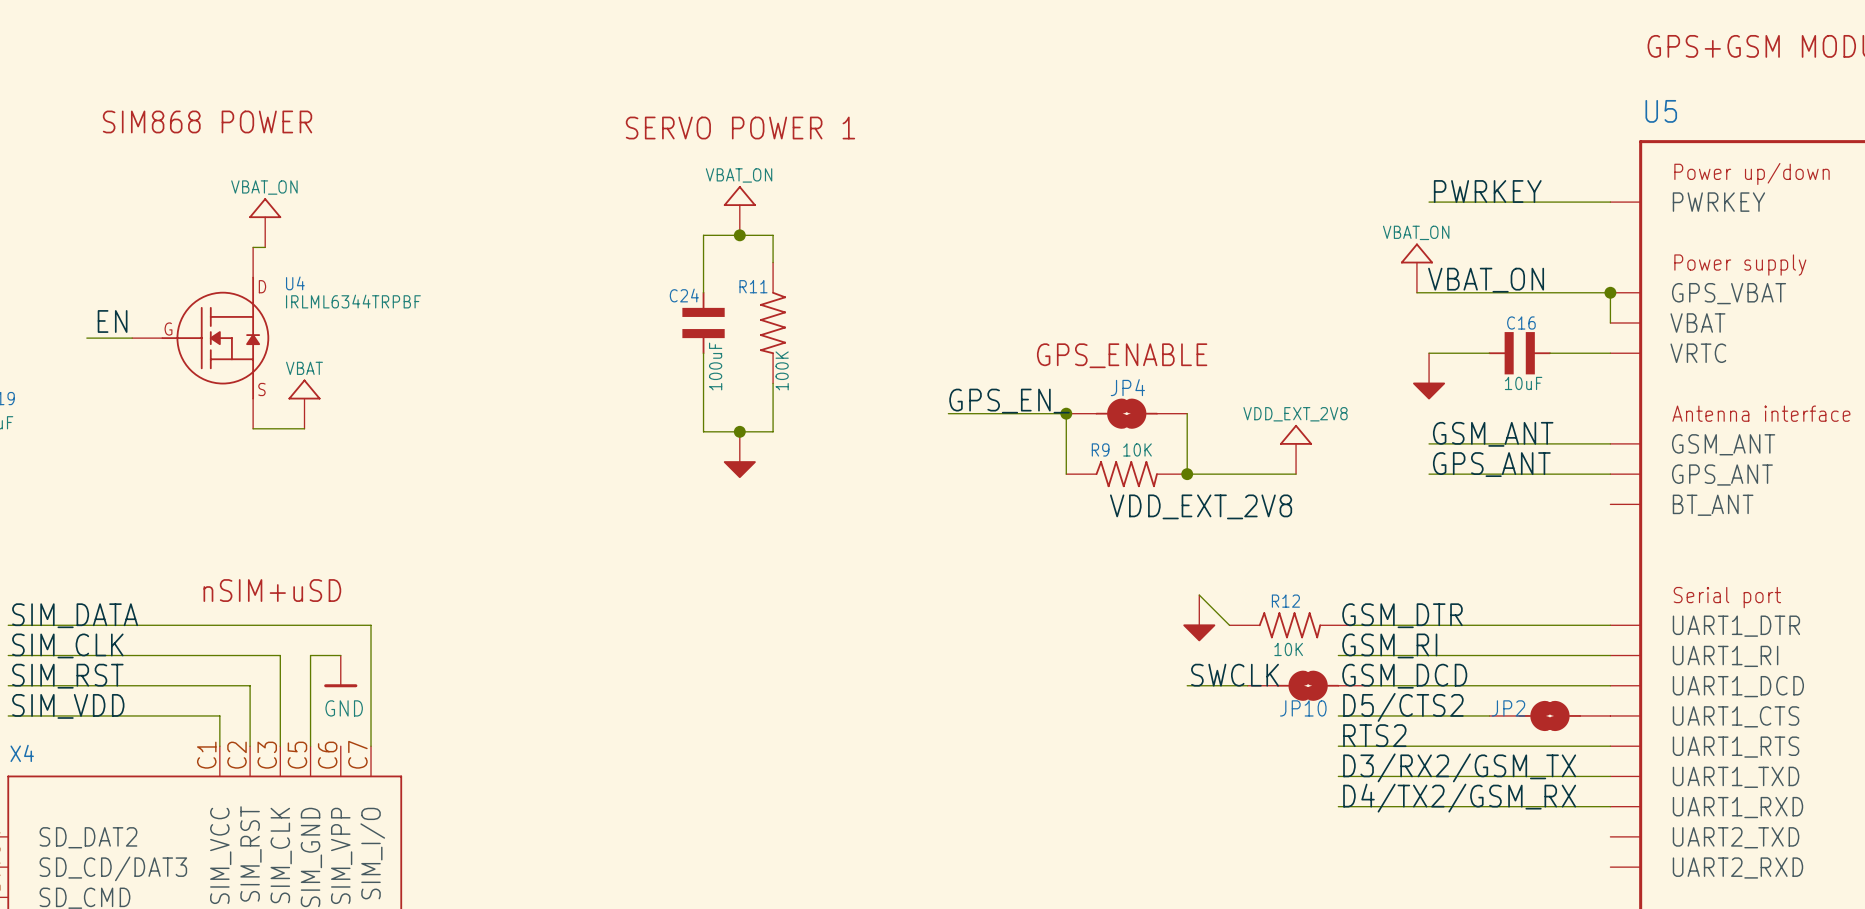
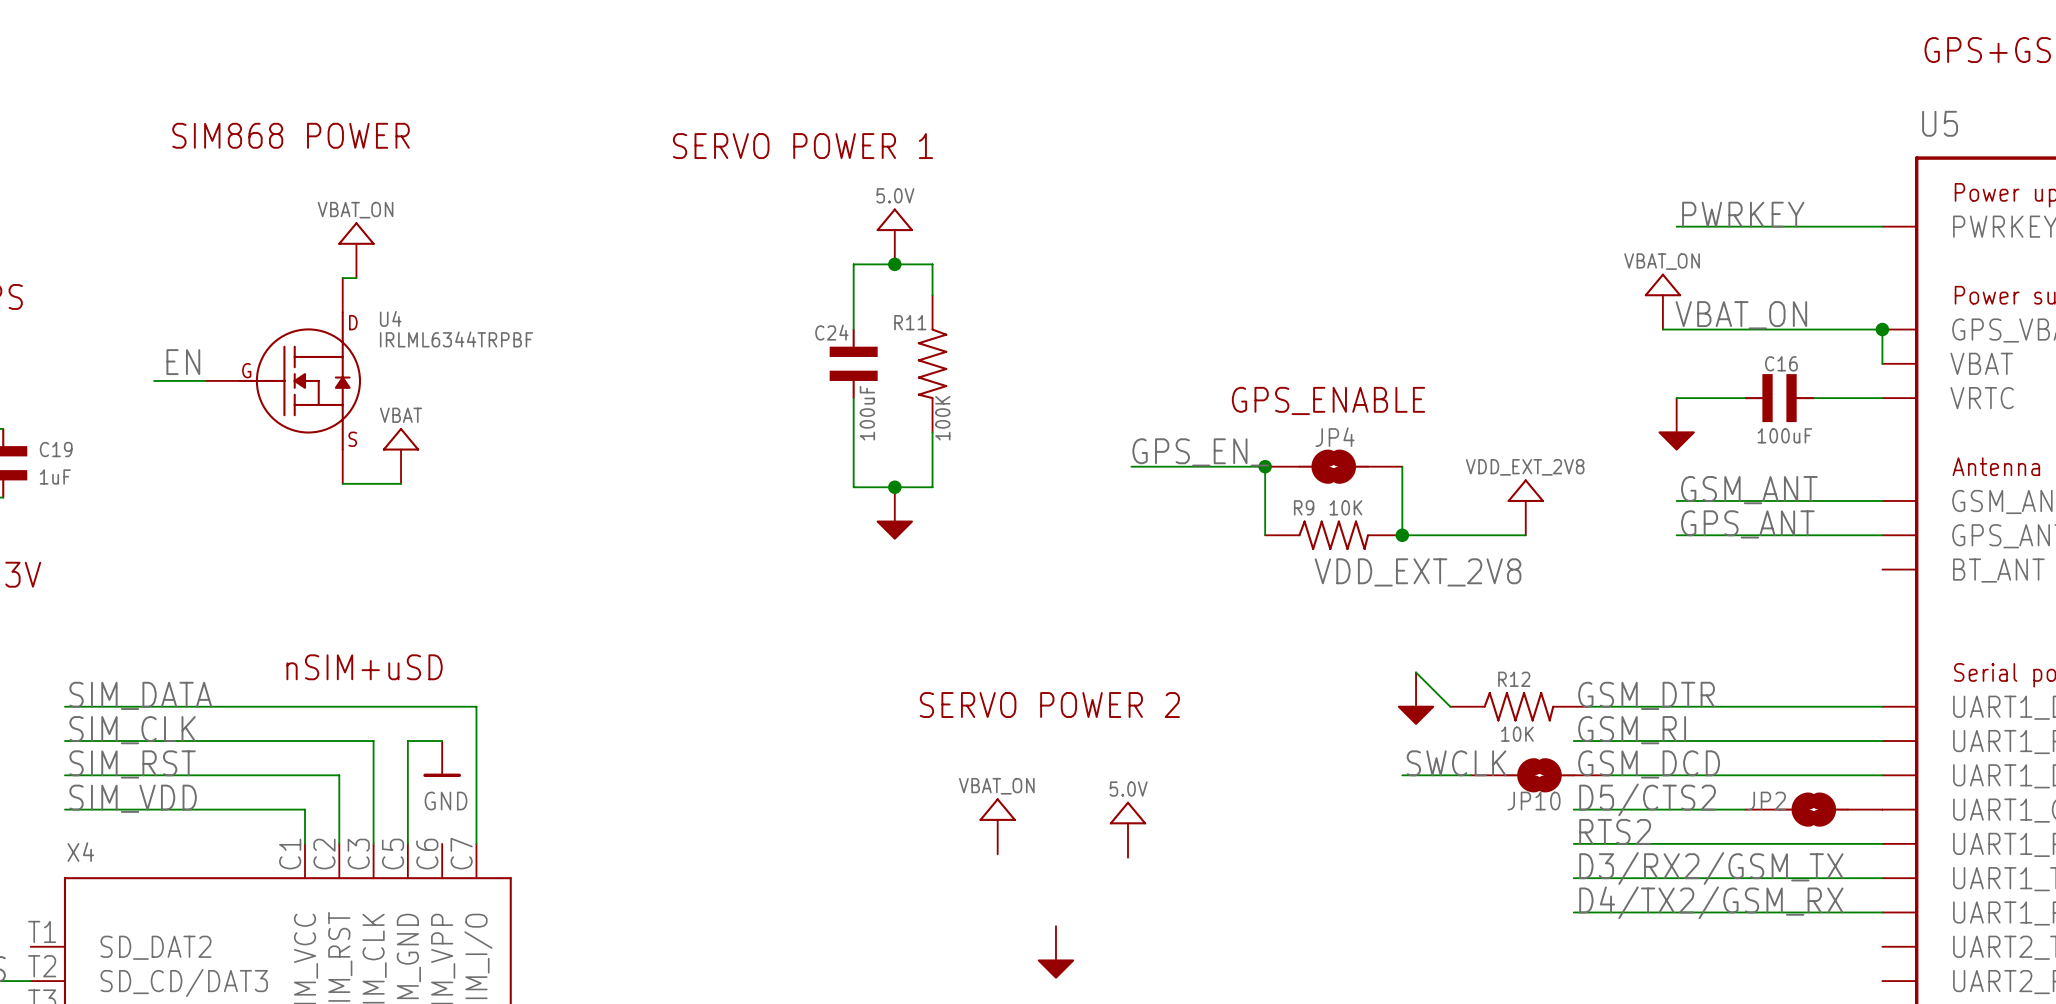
text position: SERVO POWER 1 (740, 128) -> SERVO POWER 1 (802, 146)
power symbol: VBAT_ON (739, 210) -> 5.0V (894, 236)
C16 value: 10uF (1523, 383) -> 100uF (1784, 435)
text: none -> SERVO POWER 2 (1049, 705)
power symbol: none -> VBAT_ON (997, 826)
power symbol: none -> 5.0V (1128, 829)
power symbol: none -> (1055, 952)

